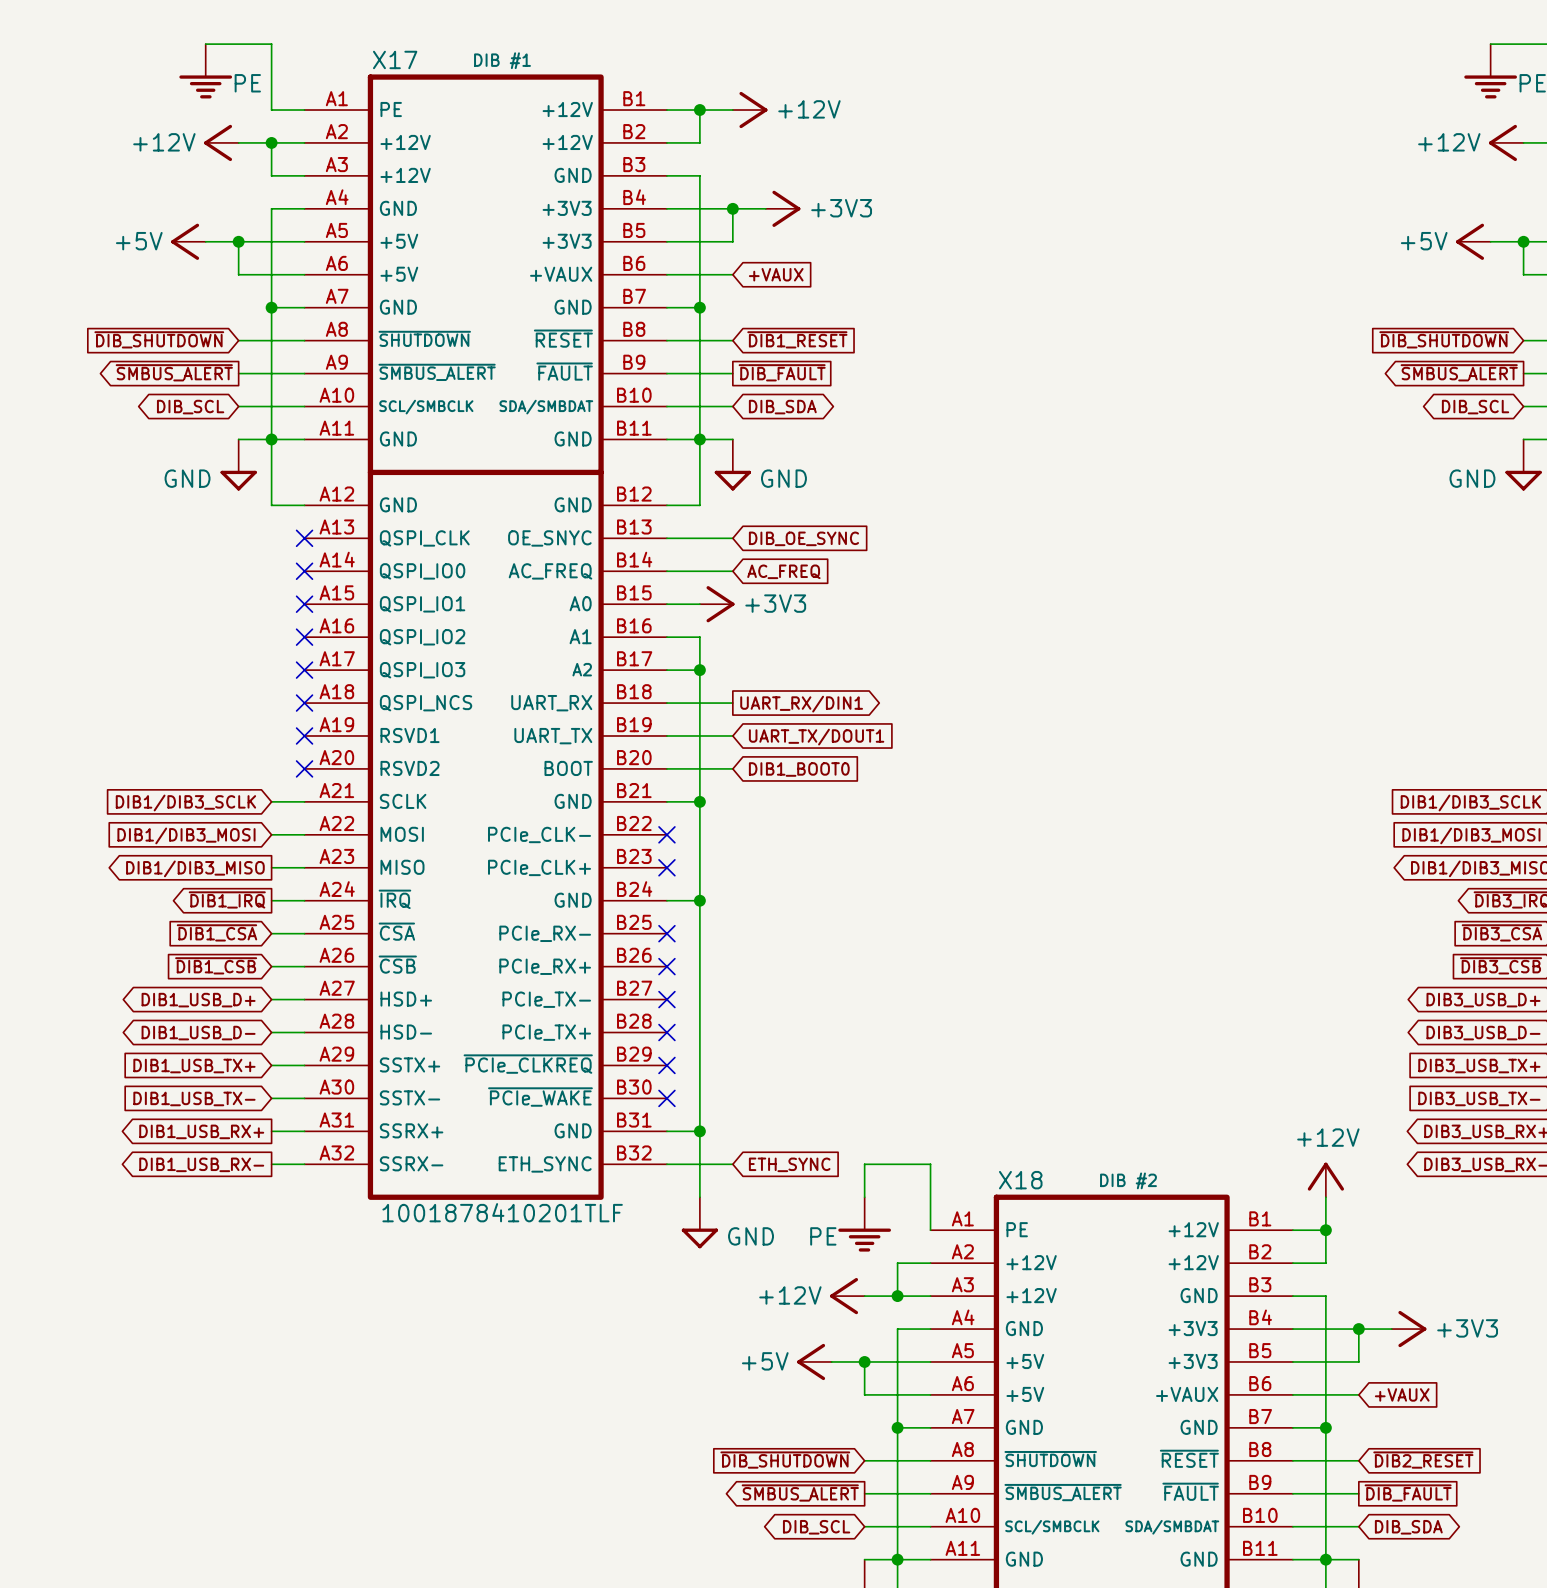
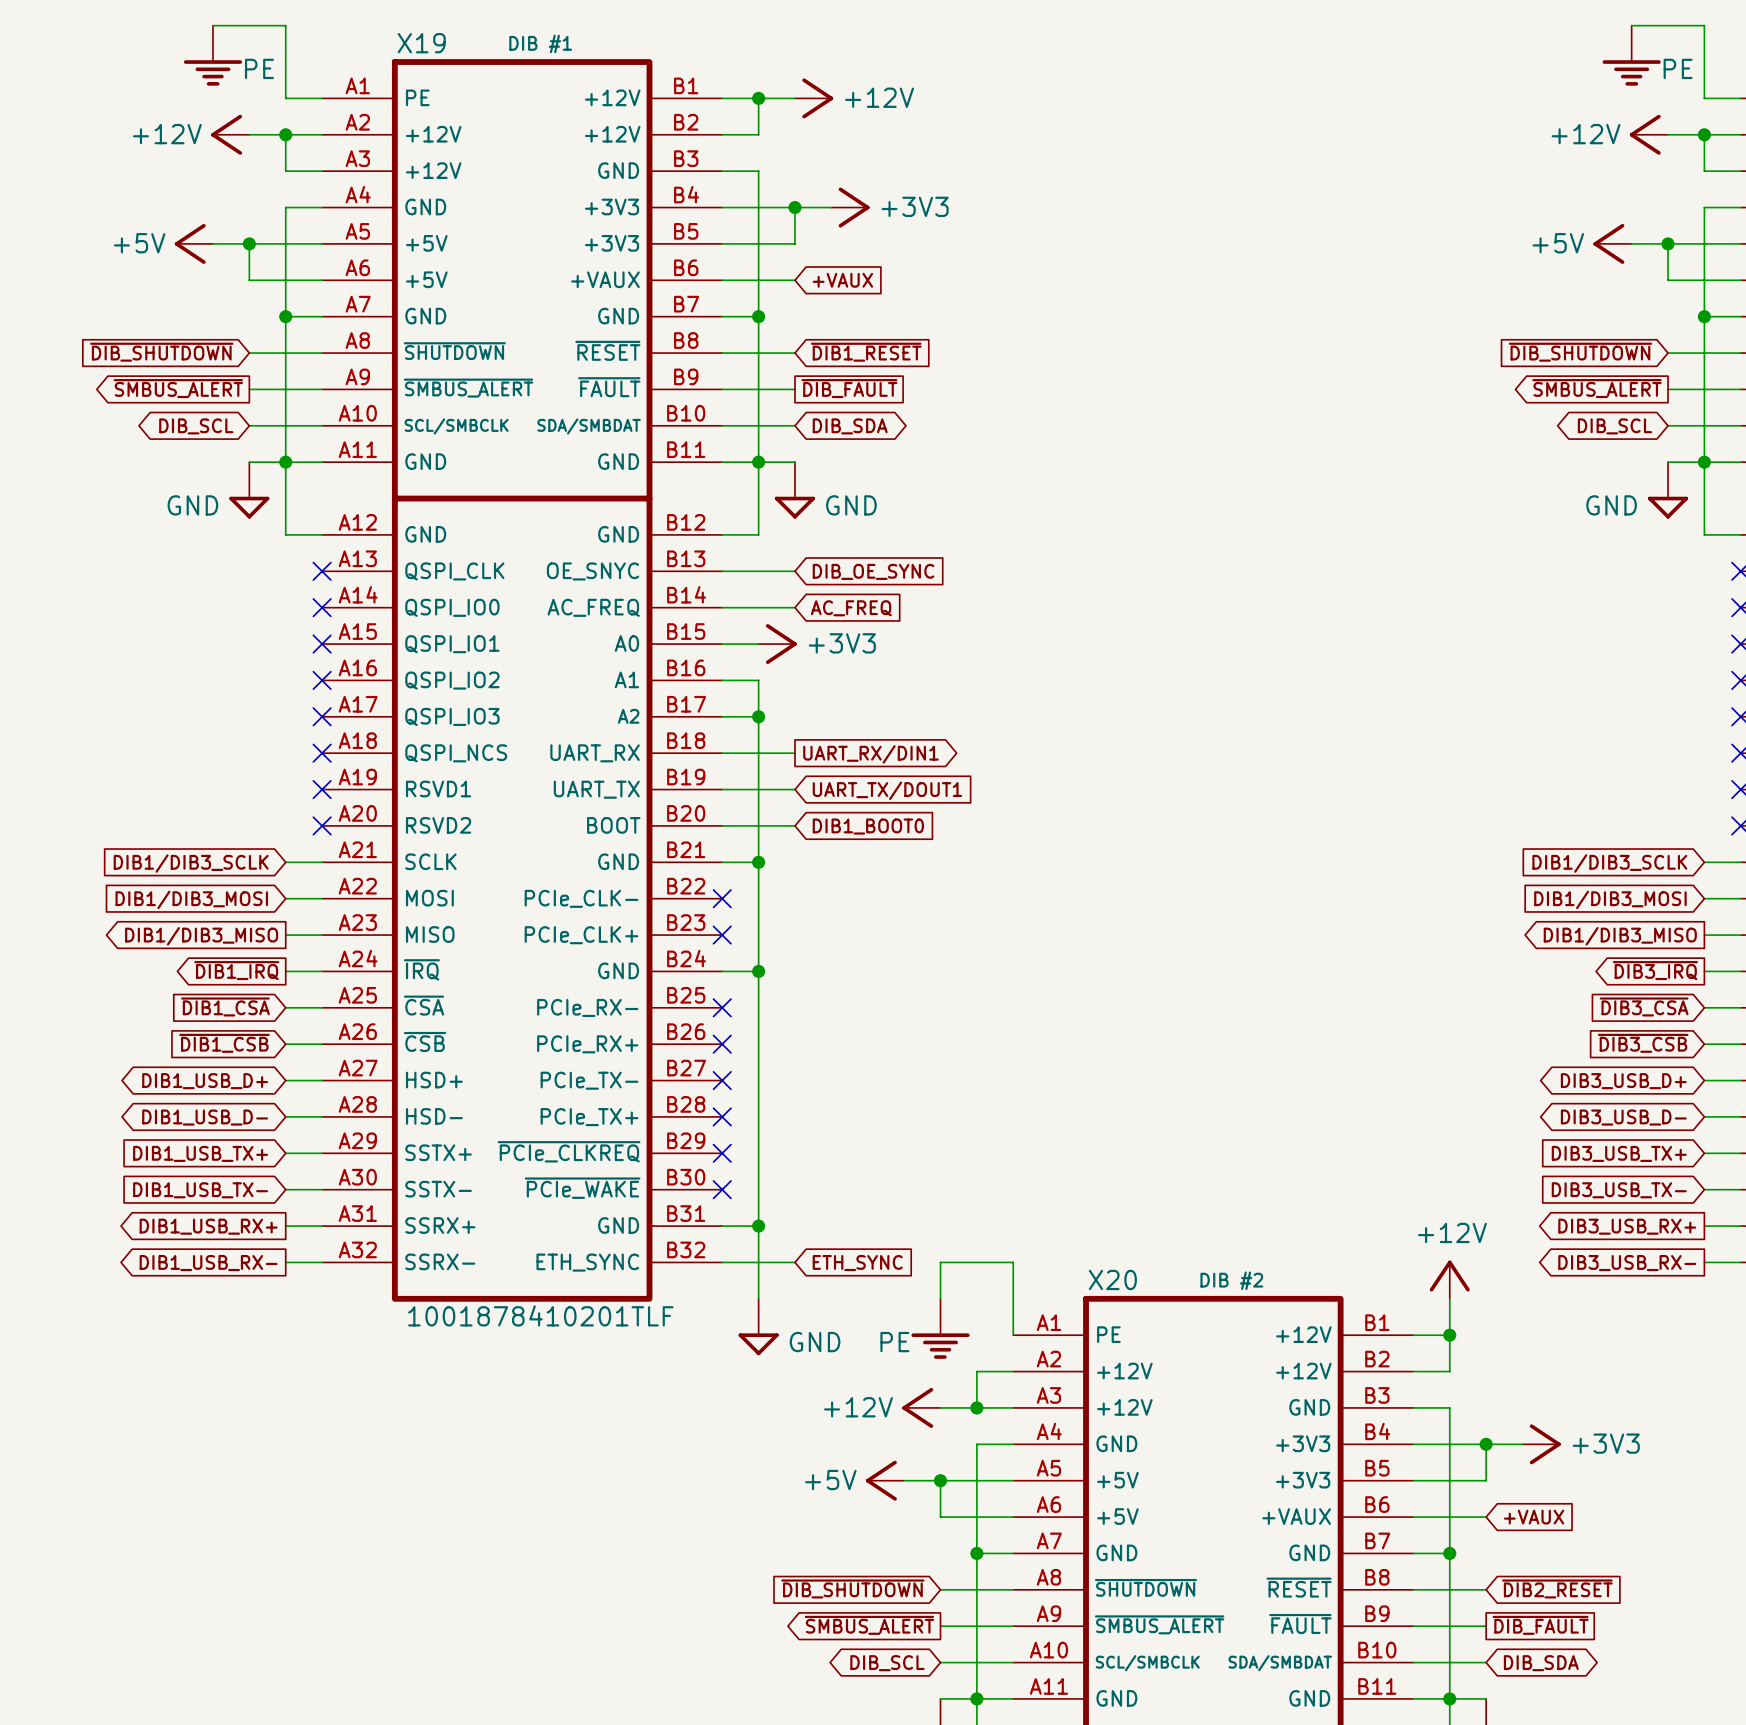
X17 name: X17 (395, 59) -> X19 (421, 43)
X18 name: X18 (1020, 1180) -> X20 (1112, 1279)

